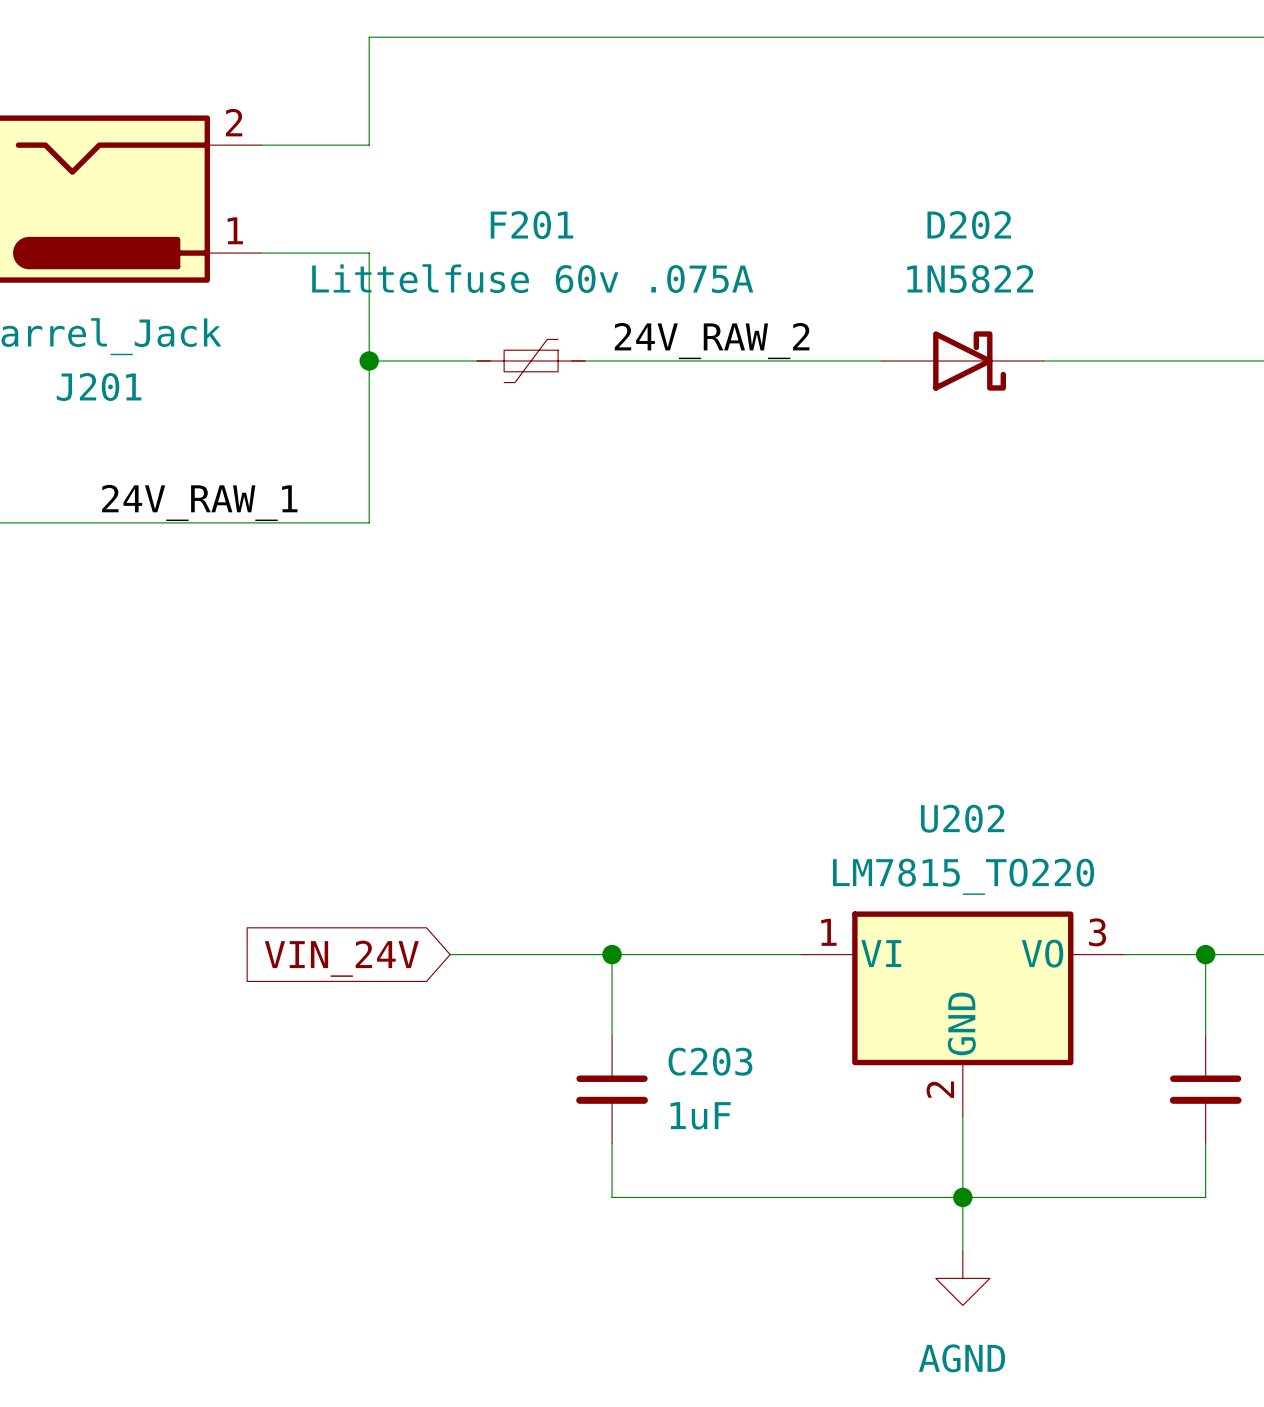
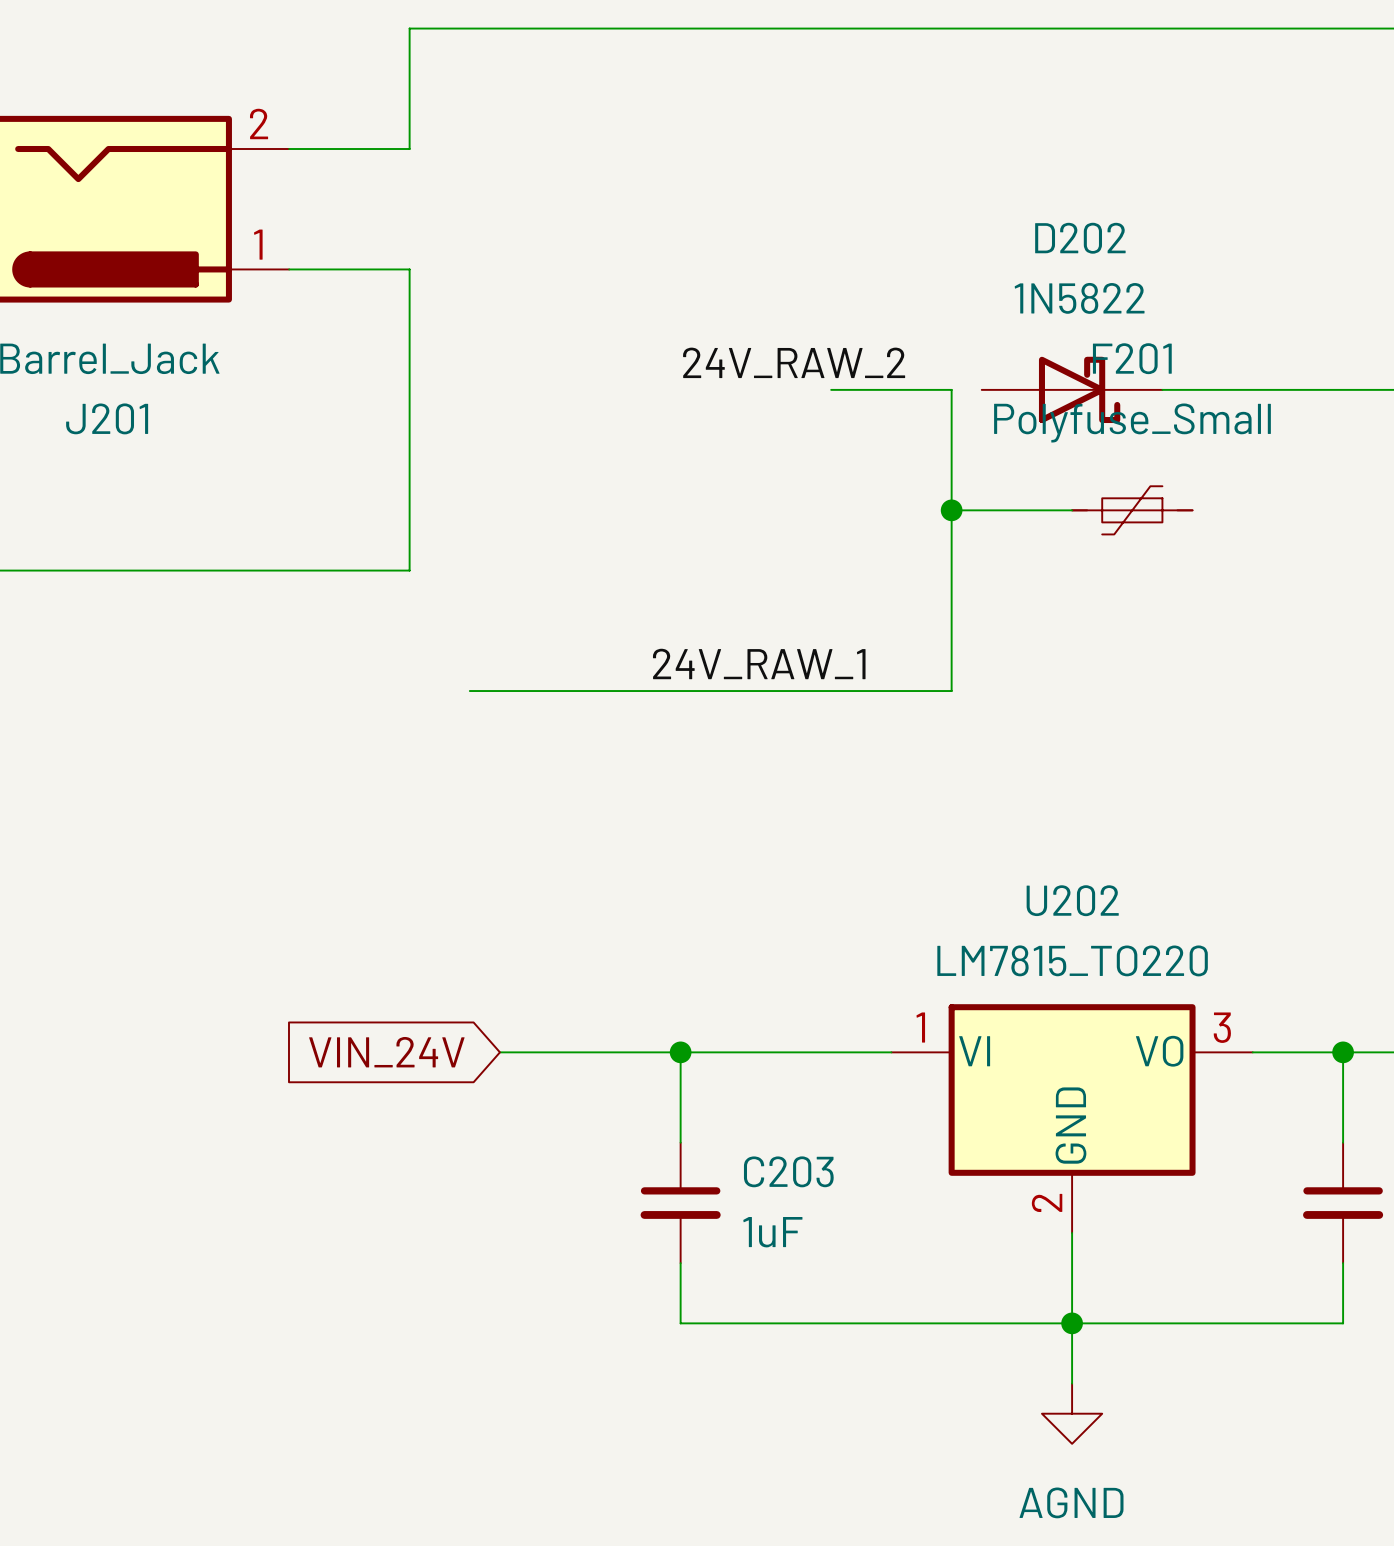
F201 value: Littelfuse 60v .075A (532, 278) -> Polyfuse_Small (1132, 423)
wire: (369, 360) (477, 360) -> (951, 510) (1072, 510)
junction: (369, 360) -> none
F201 position: (531, 360) -> (1132, 510)
wire: (585, 360) (746, 360) -> none
wire: (854, 360) (881, 360) -> (951, 389) (951, 691) (469, 691)
junction: none -> (951, 510)
label position: 24V_RAW_1 (199, 502) -> 24V_RAW_1 (759, 663)

